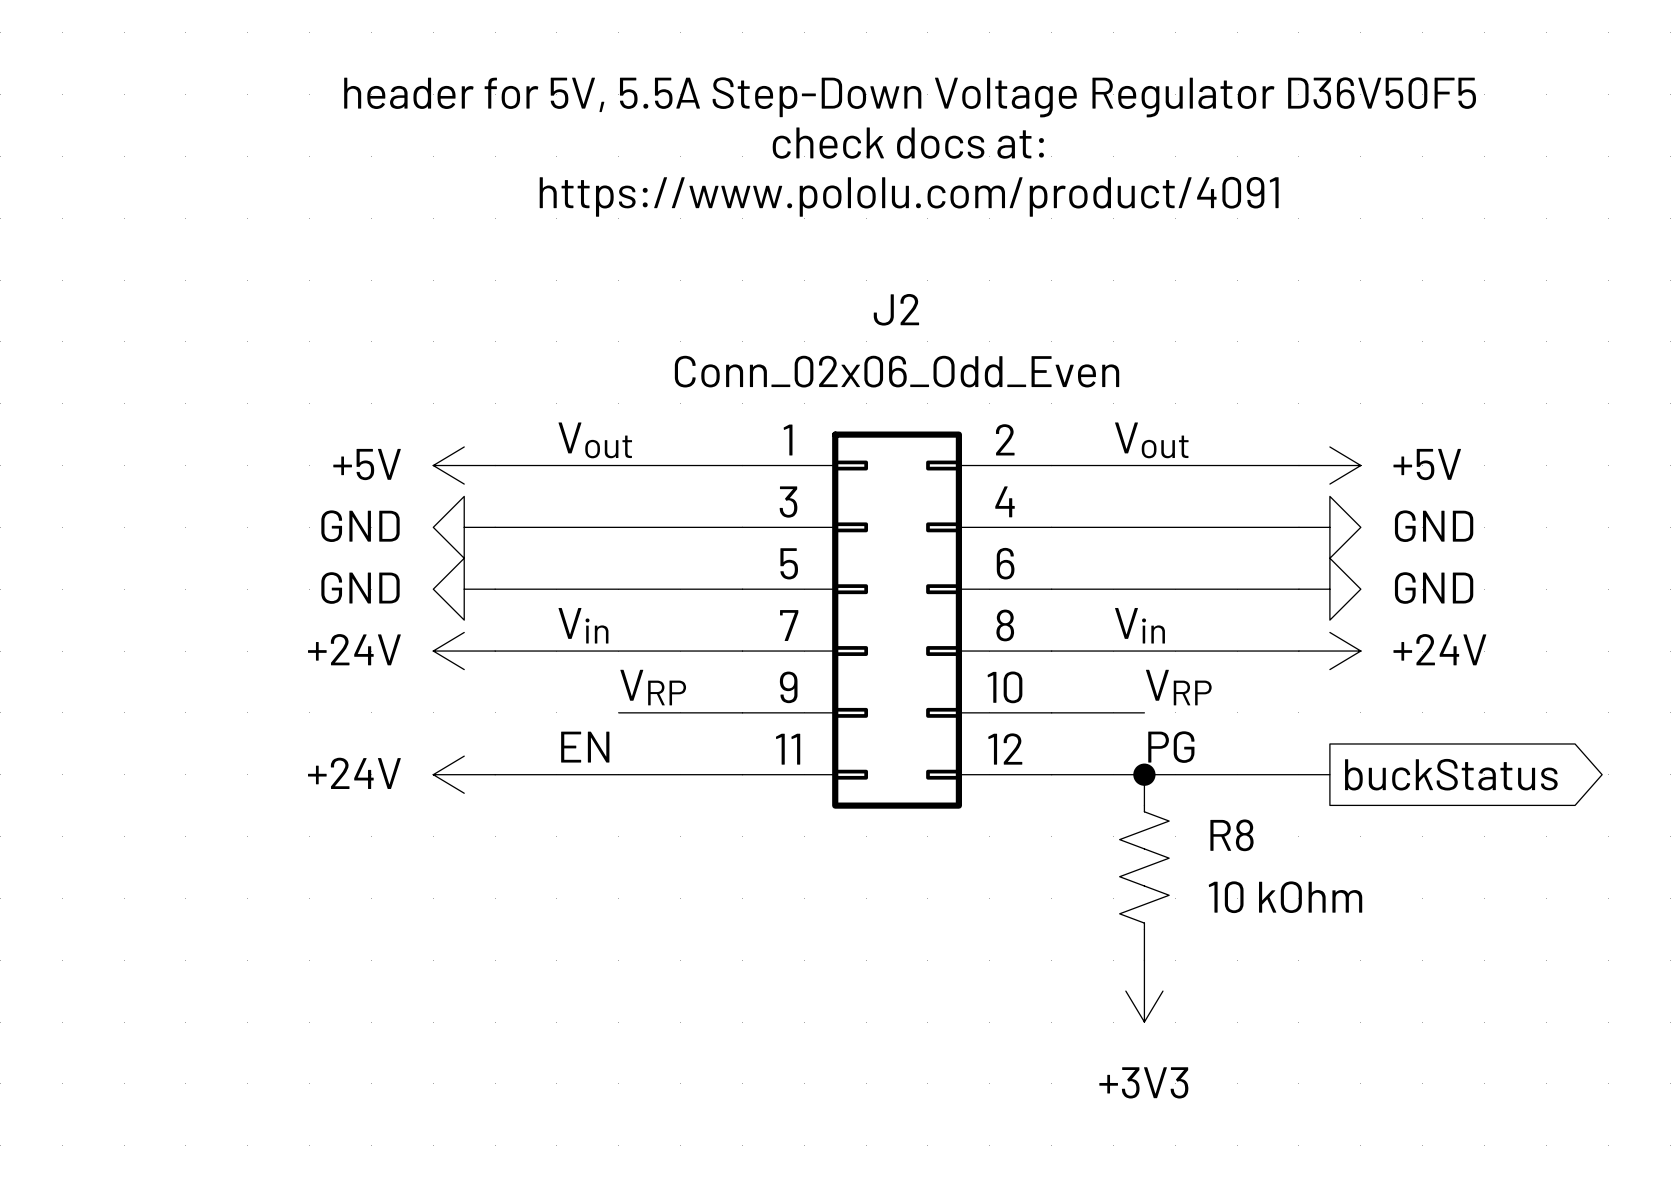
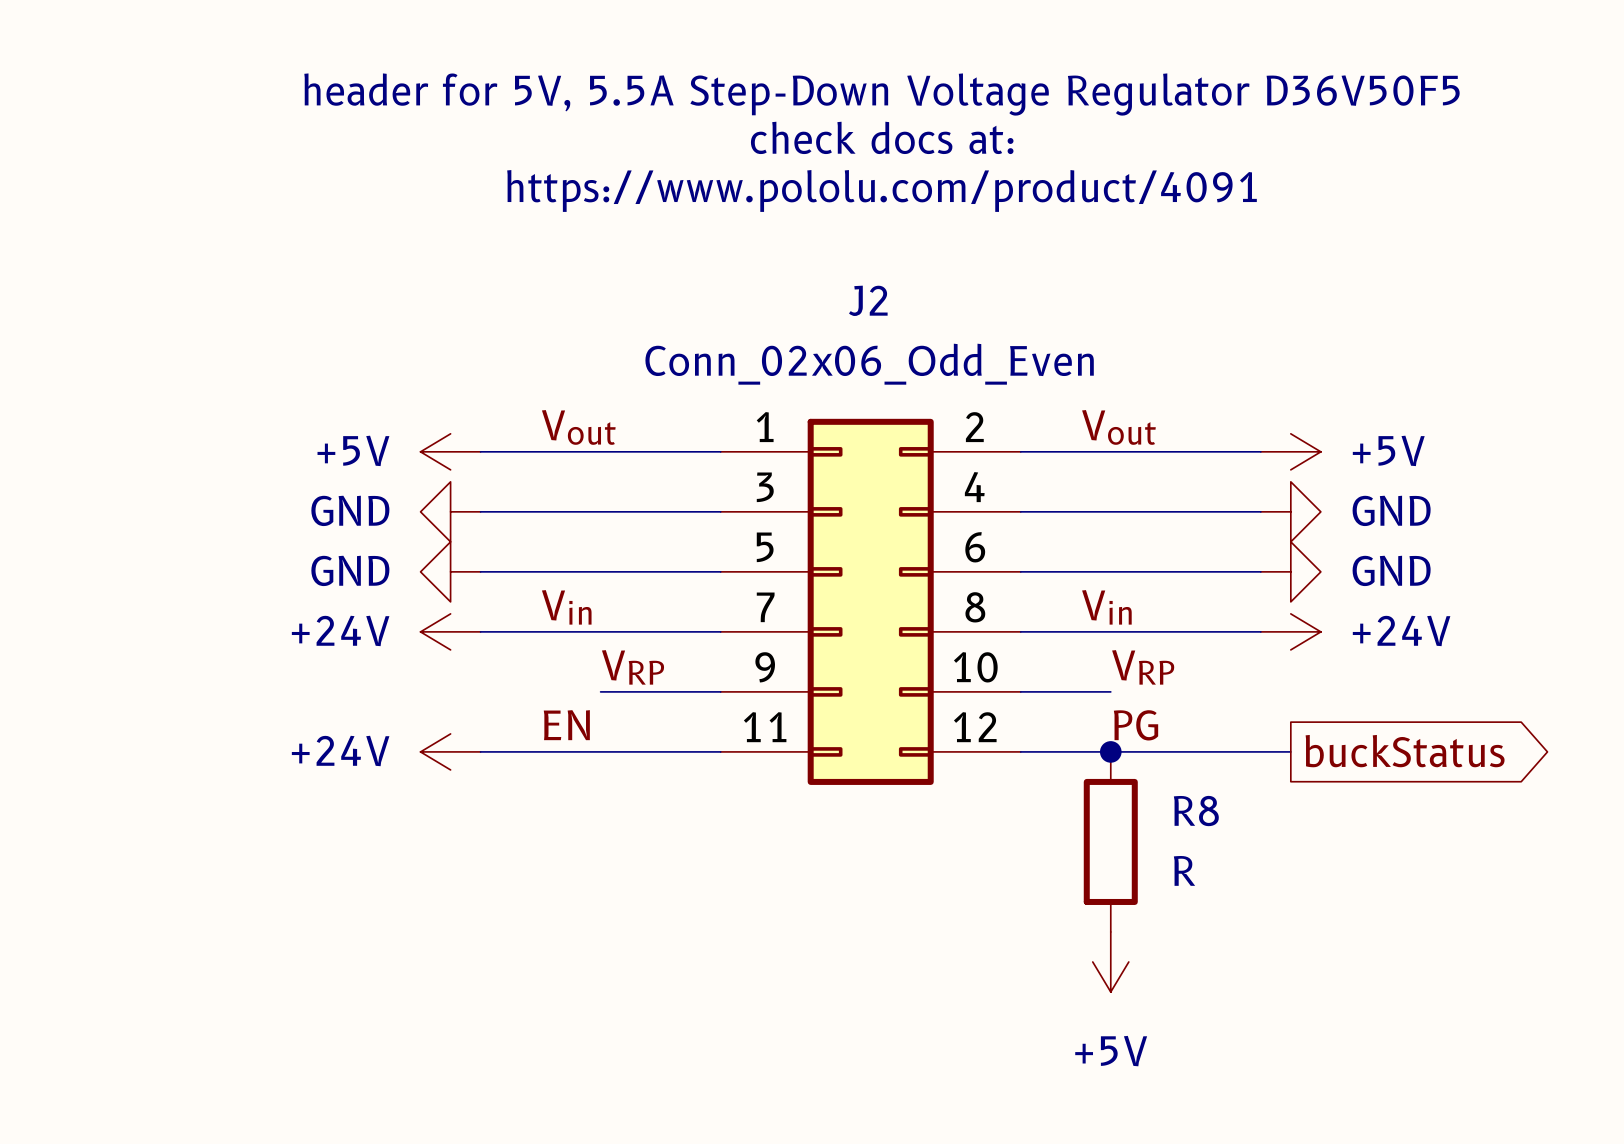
R8 symbol: [1119, 774, 1170, 961] -> [1083, 751, 1138, 932]
R8 value: 10 kOhm (1285, 897) -> R (1184, 870)
power symbol: +3V3 (1144, 991) -> +5V (1110, 961)

